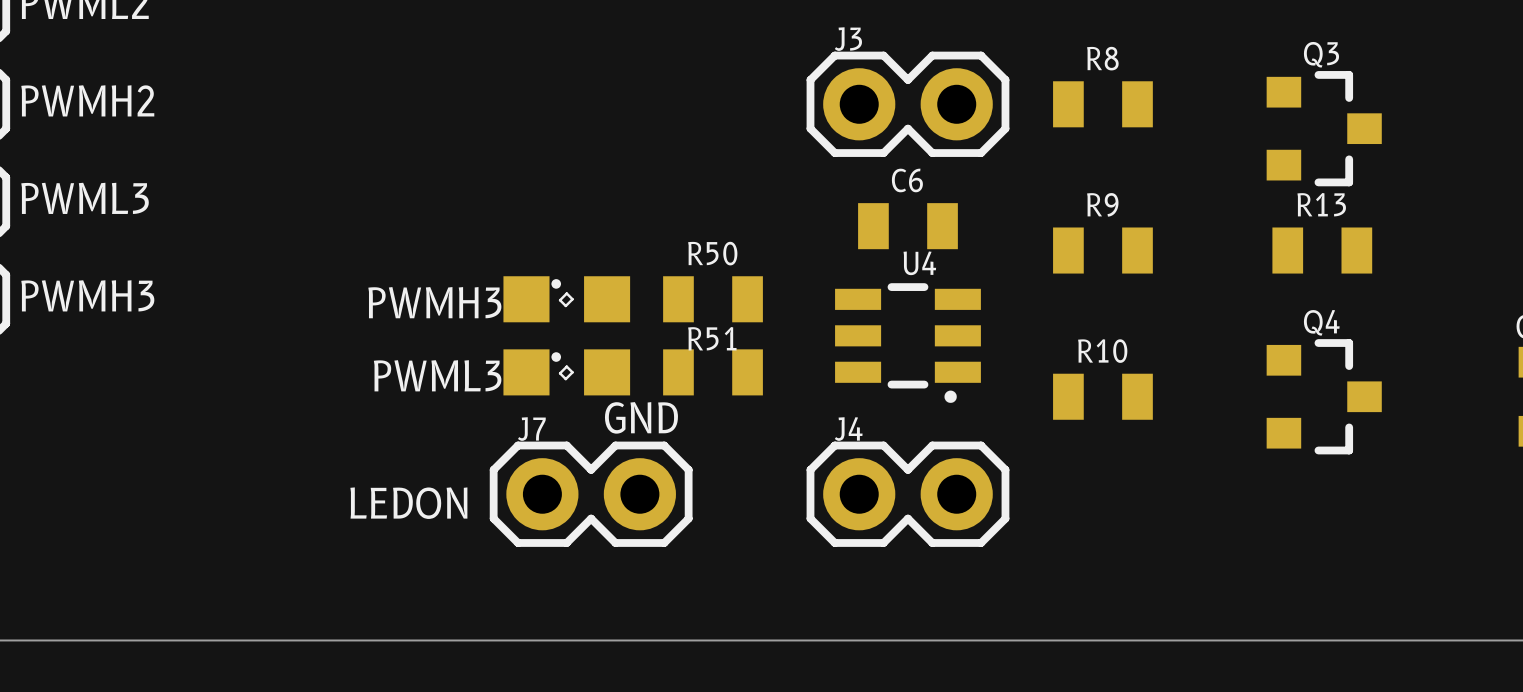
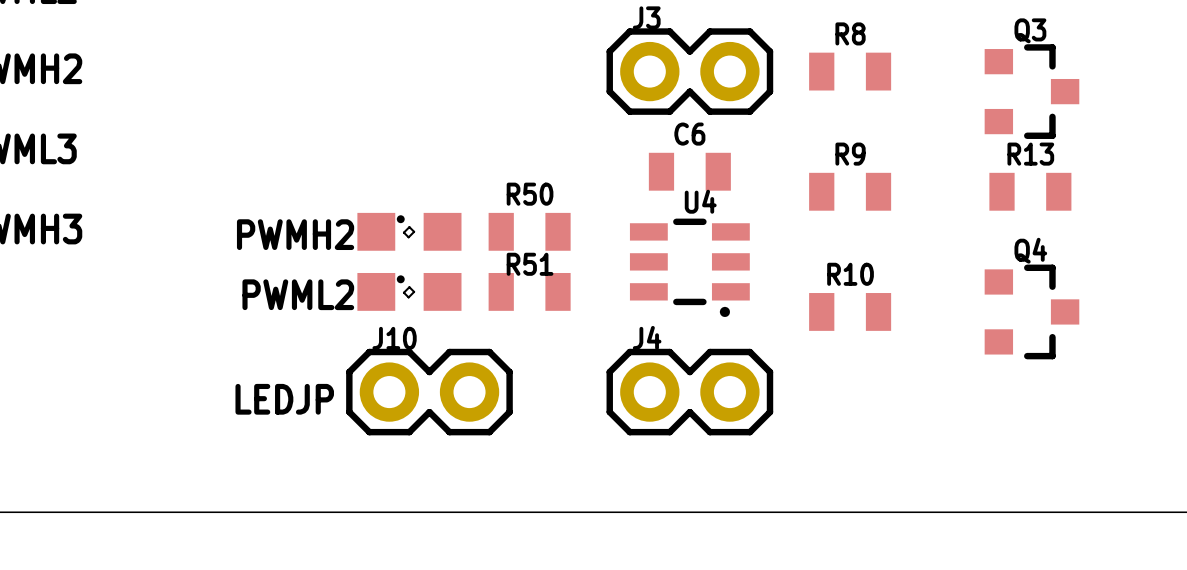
text: PWMH3 (434, 302) -> PWMH2 (295, 234)
text: PWML3 (437, 375) -> PWML2 (298, 294)
text: GND (641, 417) -> none
J7 name: J7 (531, 429) -> J10 (394, 338)
text: LEDON (408, 503) -> LEDJP (284, 399)

